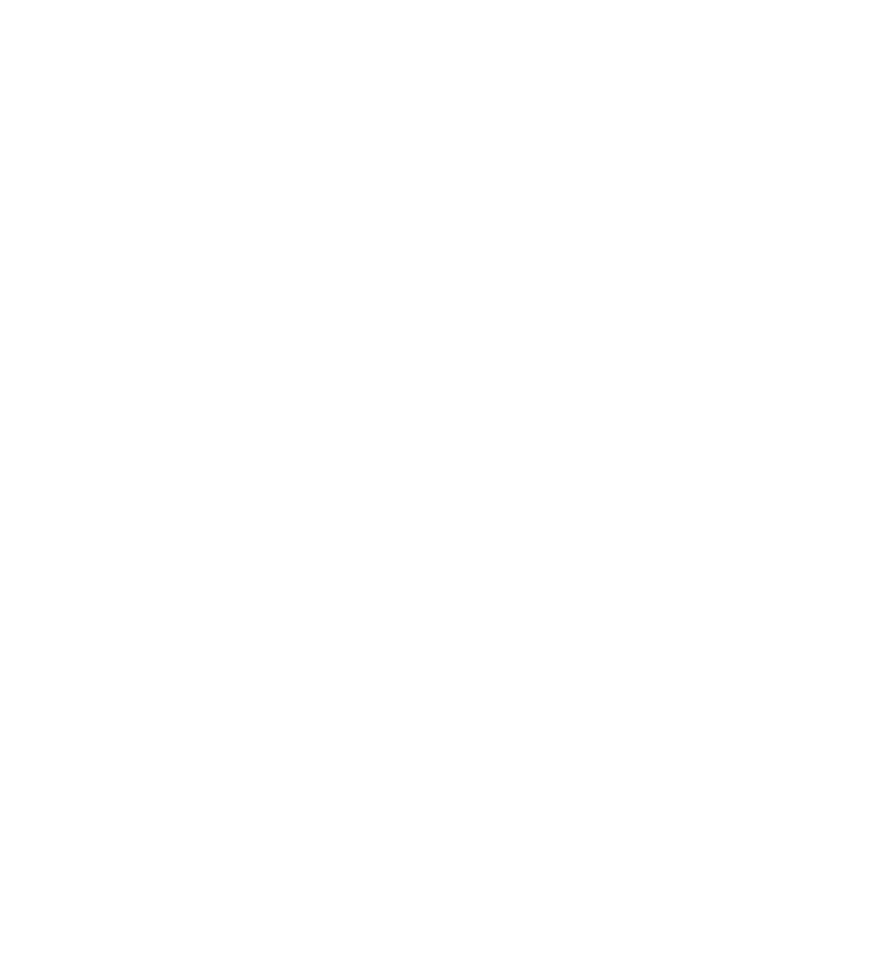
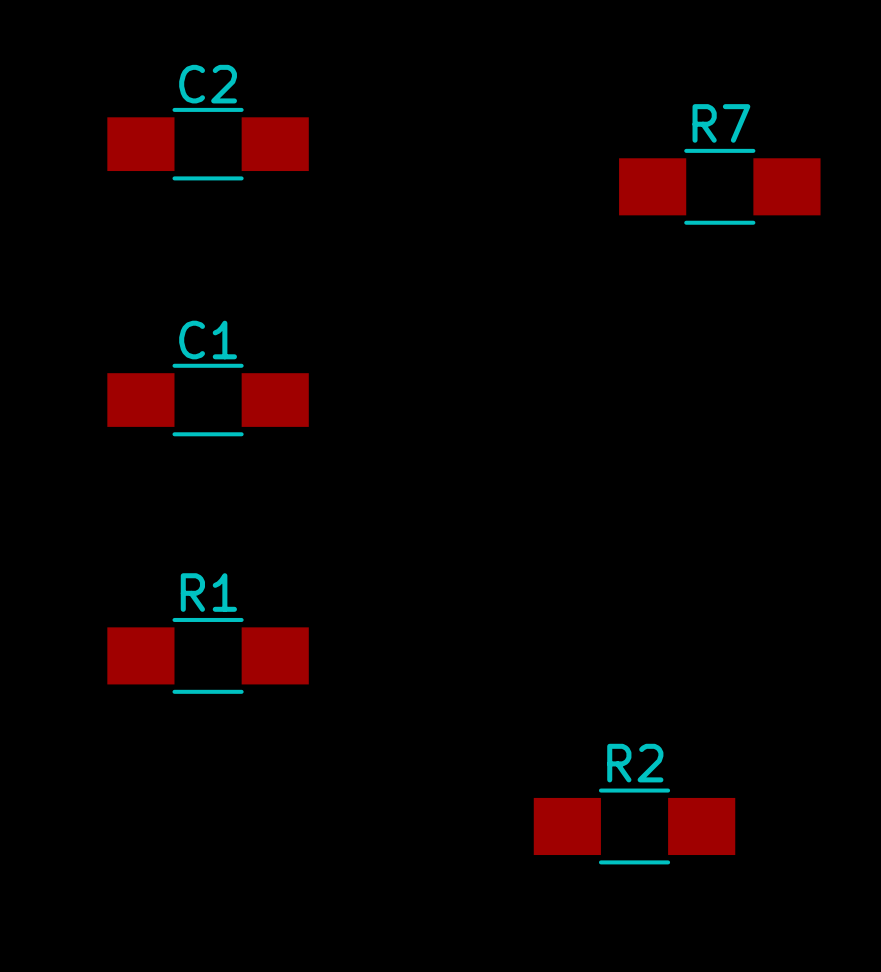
C2: none -> (208, 144)
R7: none -> (719, 186)
C1: none -> (208, 400)
R1: none -> (208, 655)
R2: none -> (634, 826)

